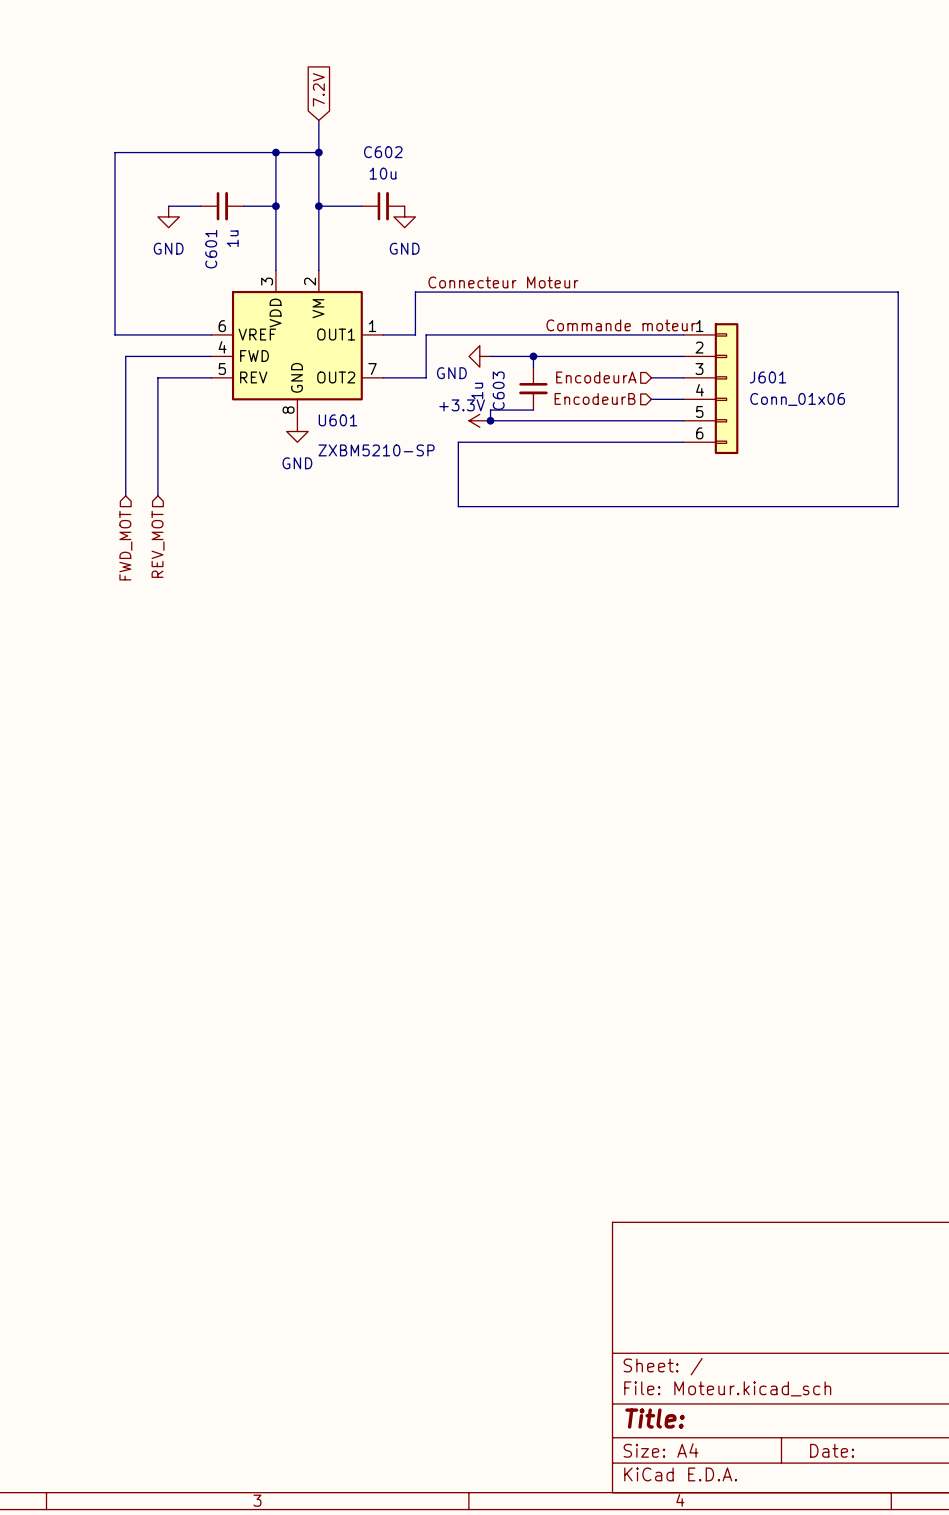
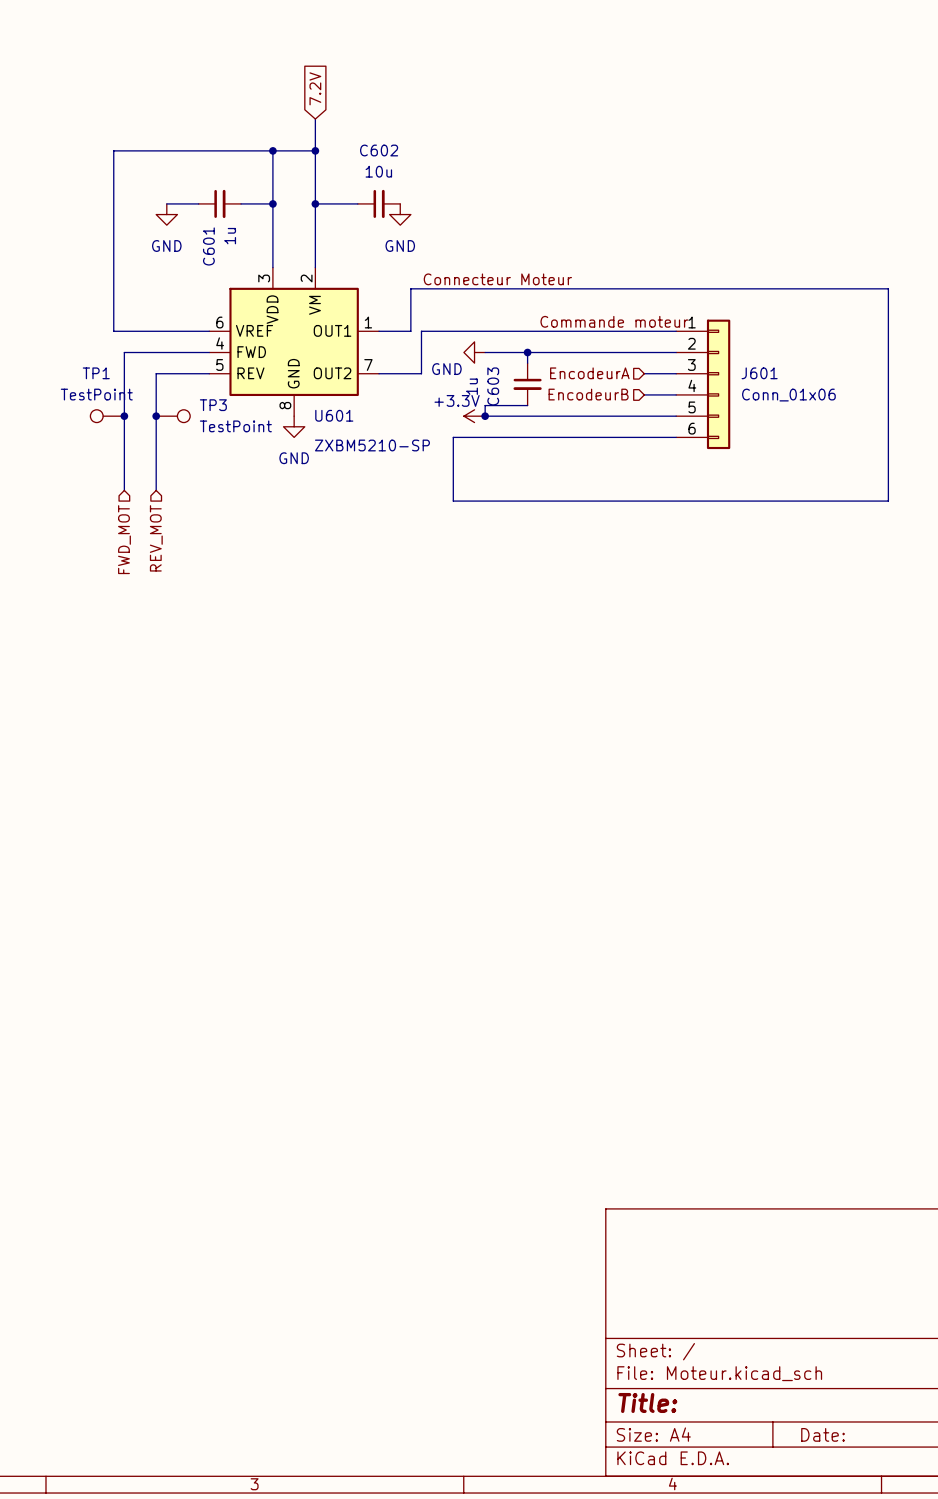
TP1: none -> TestPoint (107, 416)
junction: none -> (124, 416)
junction: none -> (156, 416)
TP3: none -> TestPoint (173, 416)

